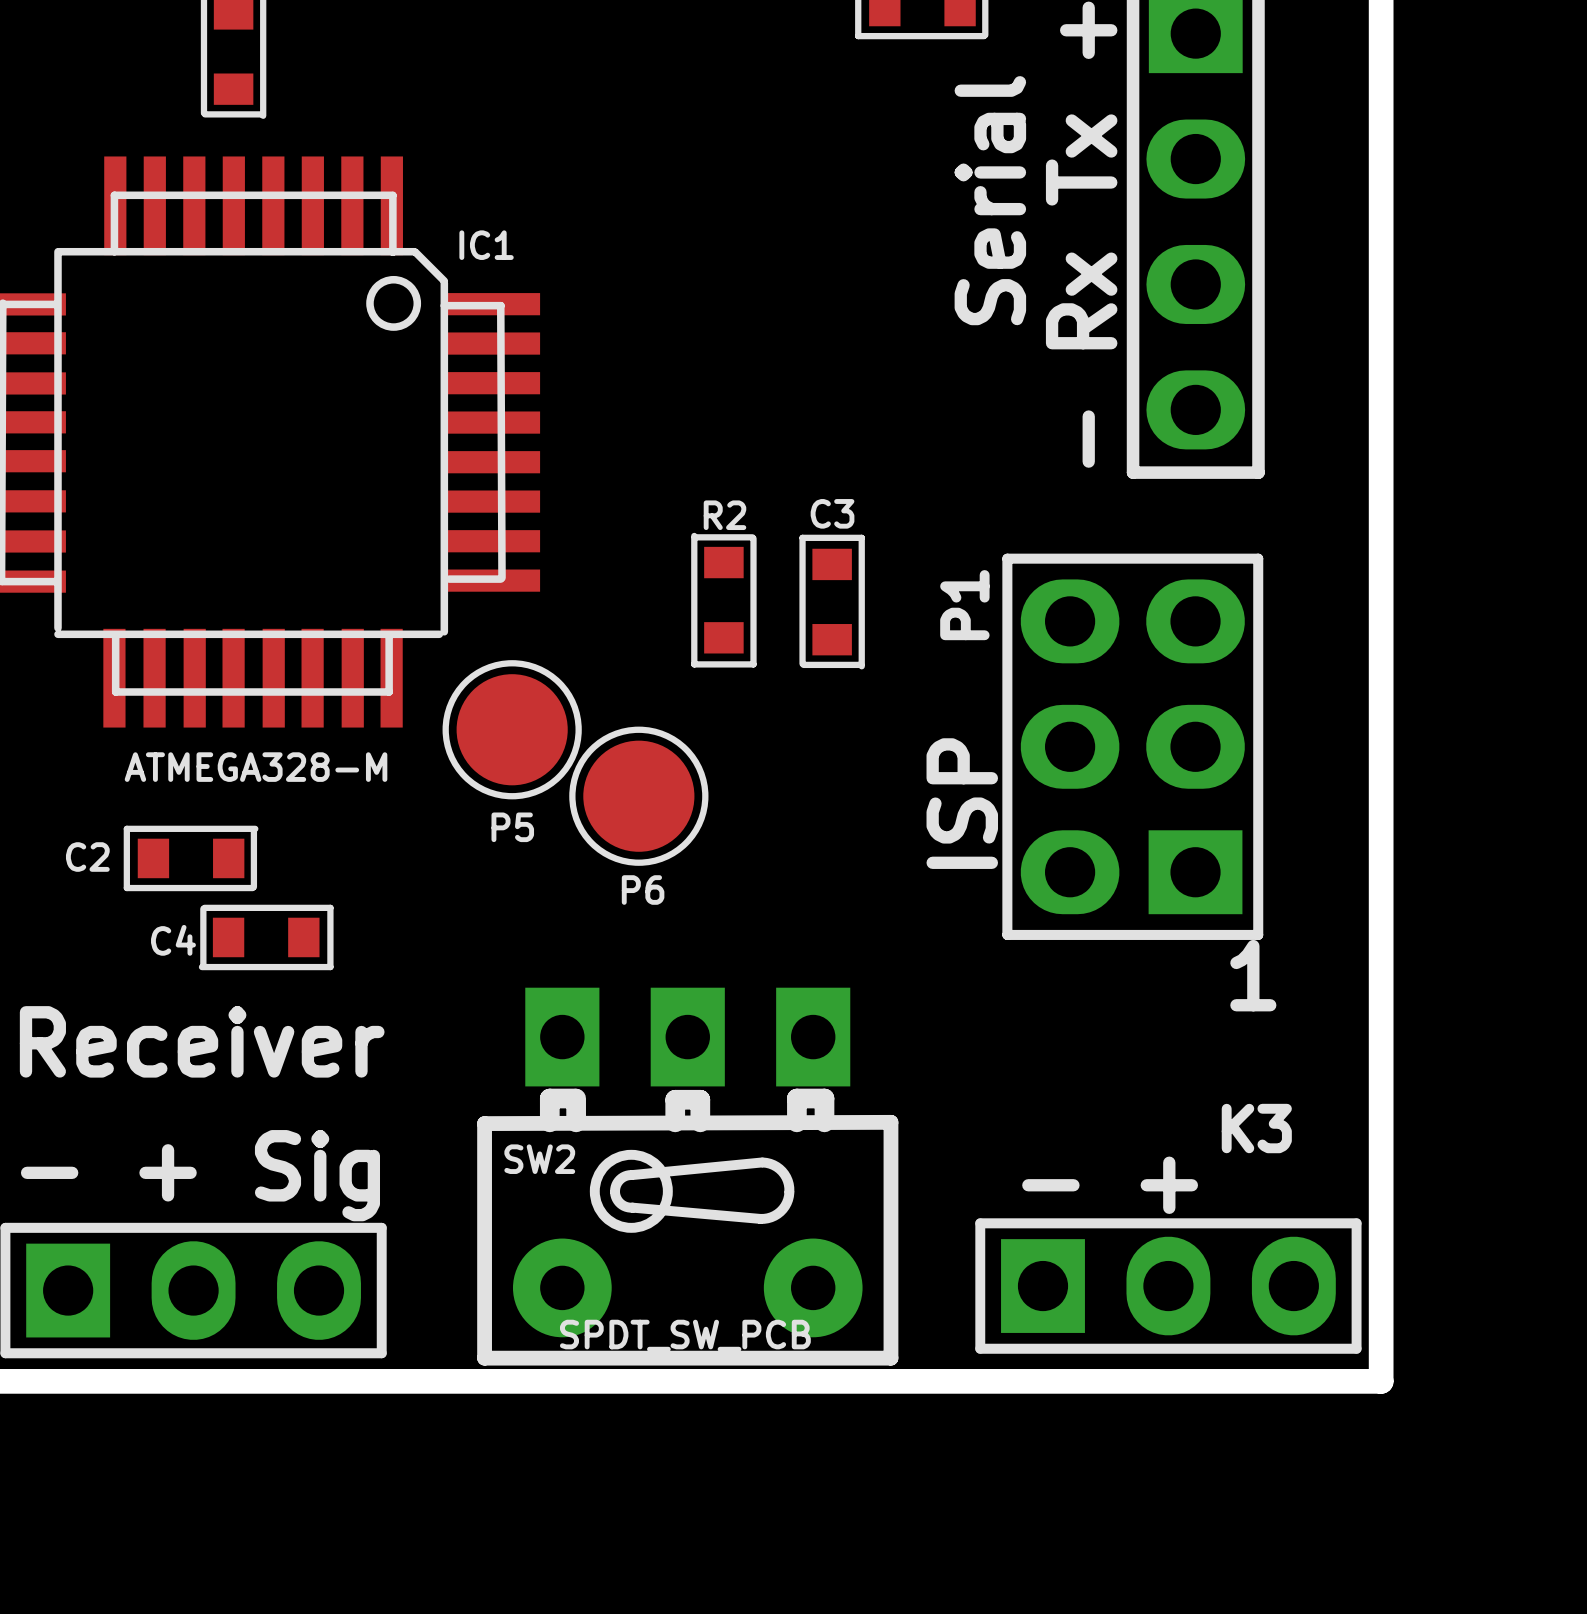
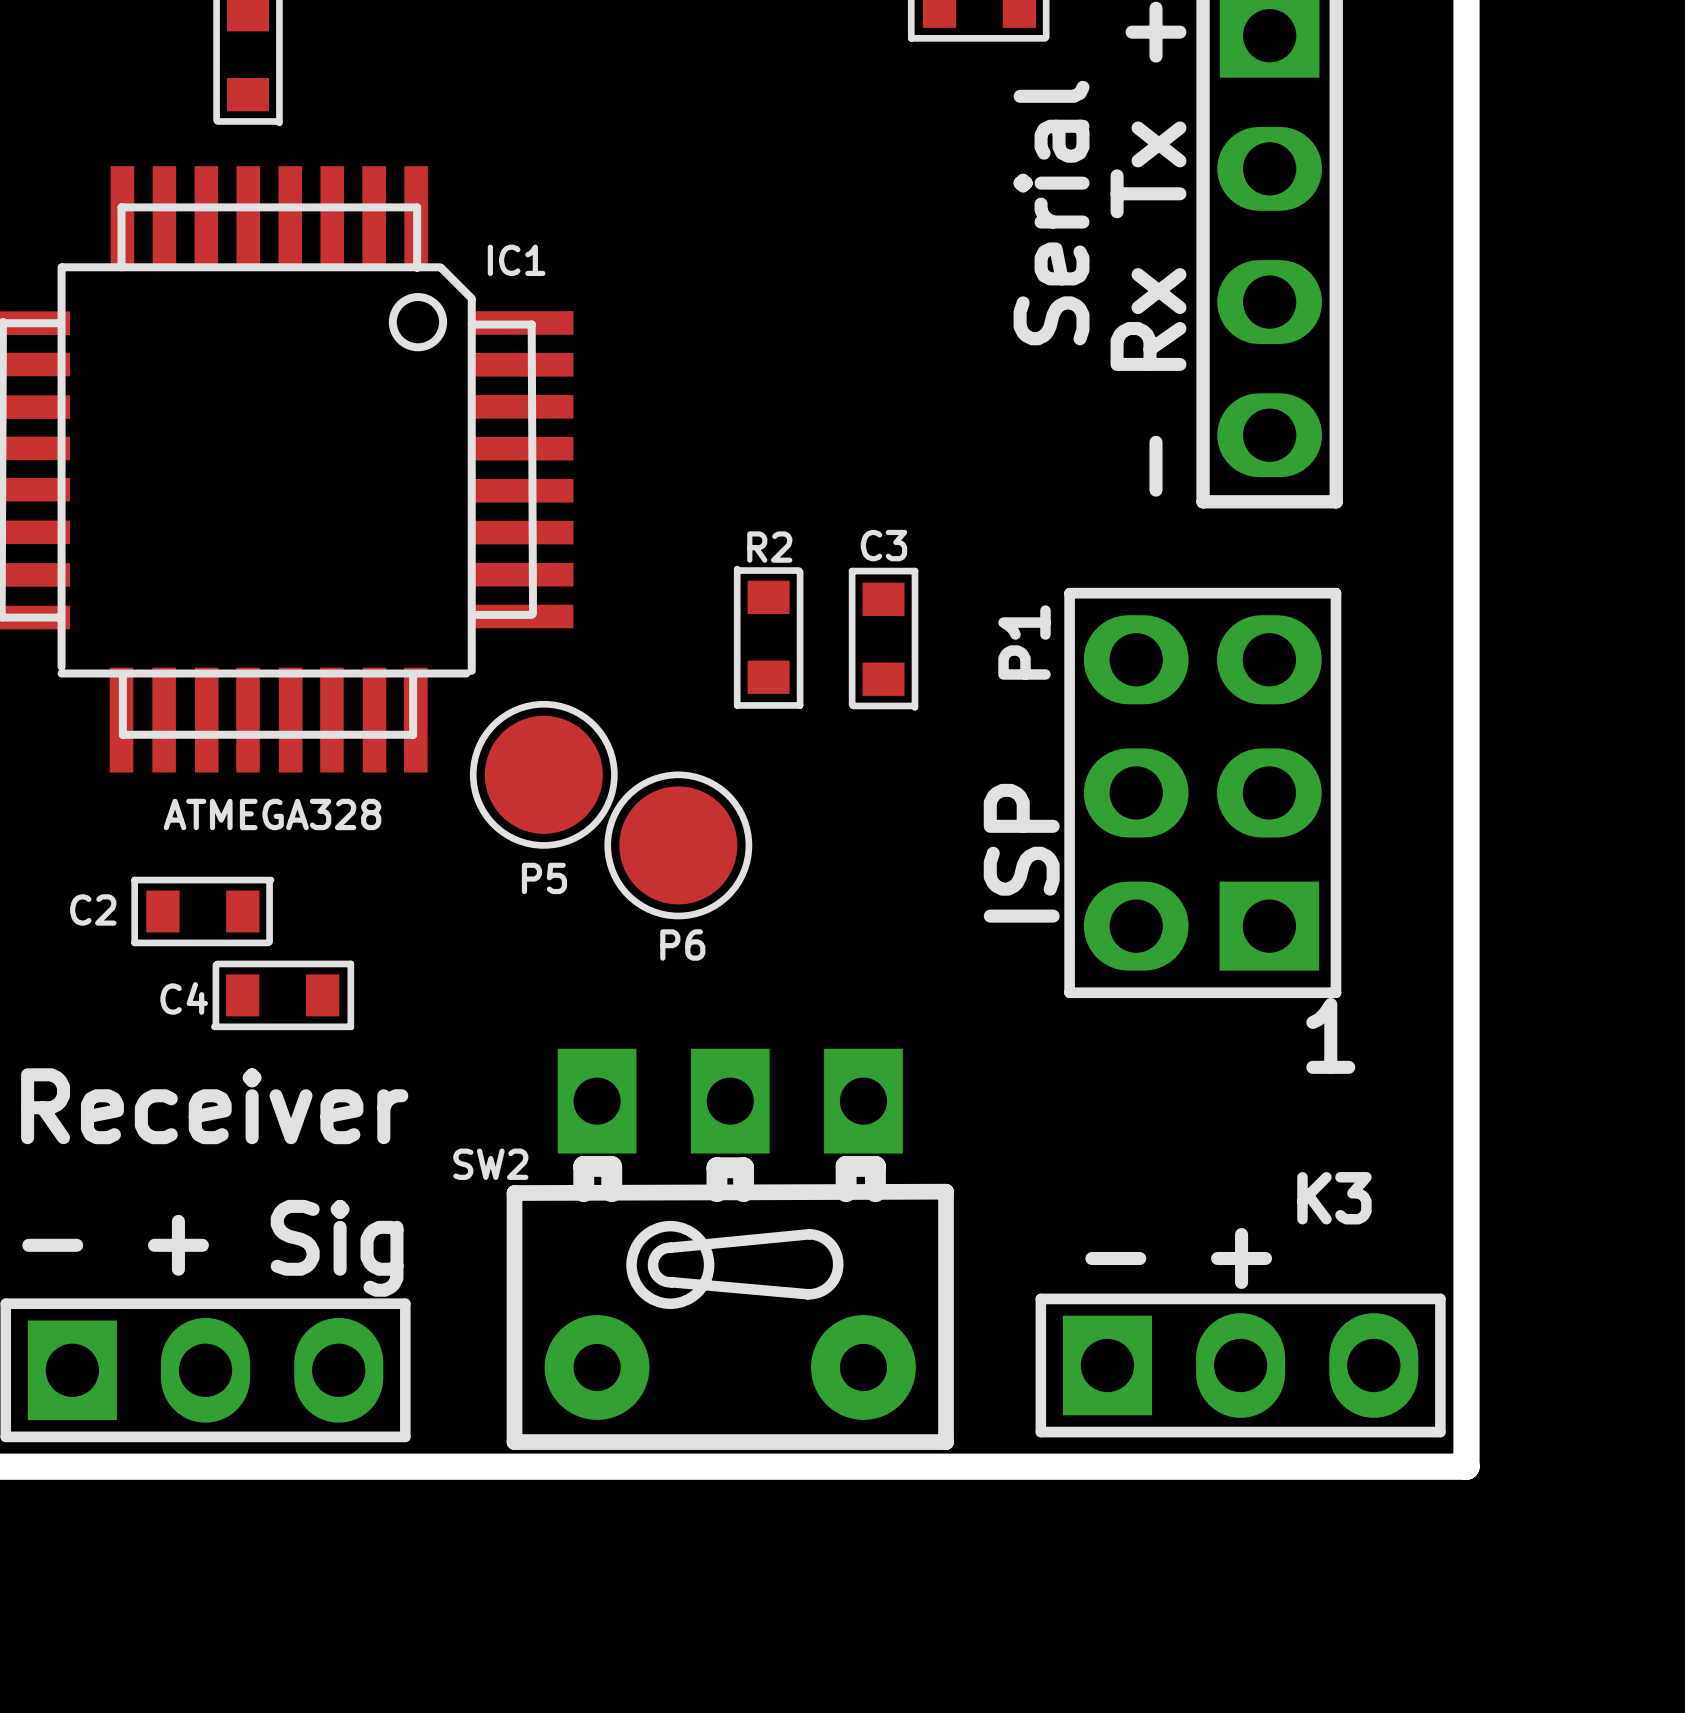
IC1 value: ATMEGA328-M (256, 767) -> ATMEGA328 (272, 814)
SW2 name position: SW2 (539, 1159) -> SW2 (490, 1164)
SW2 value: SPDT_SW_PCB (685, 1335) -> none

